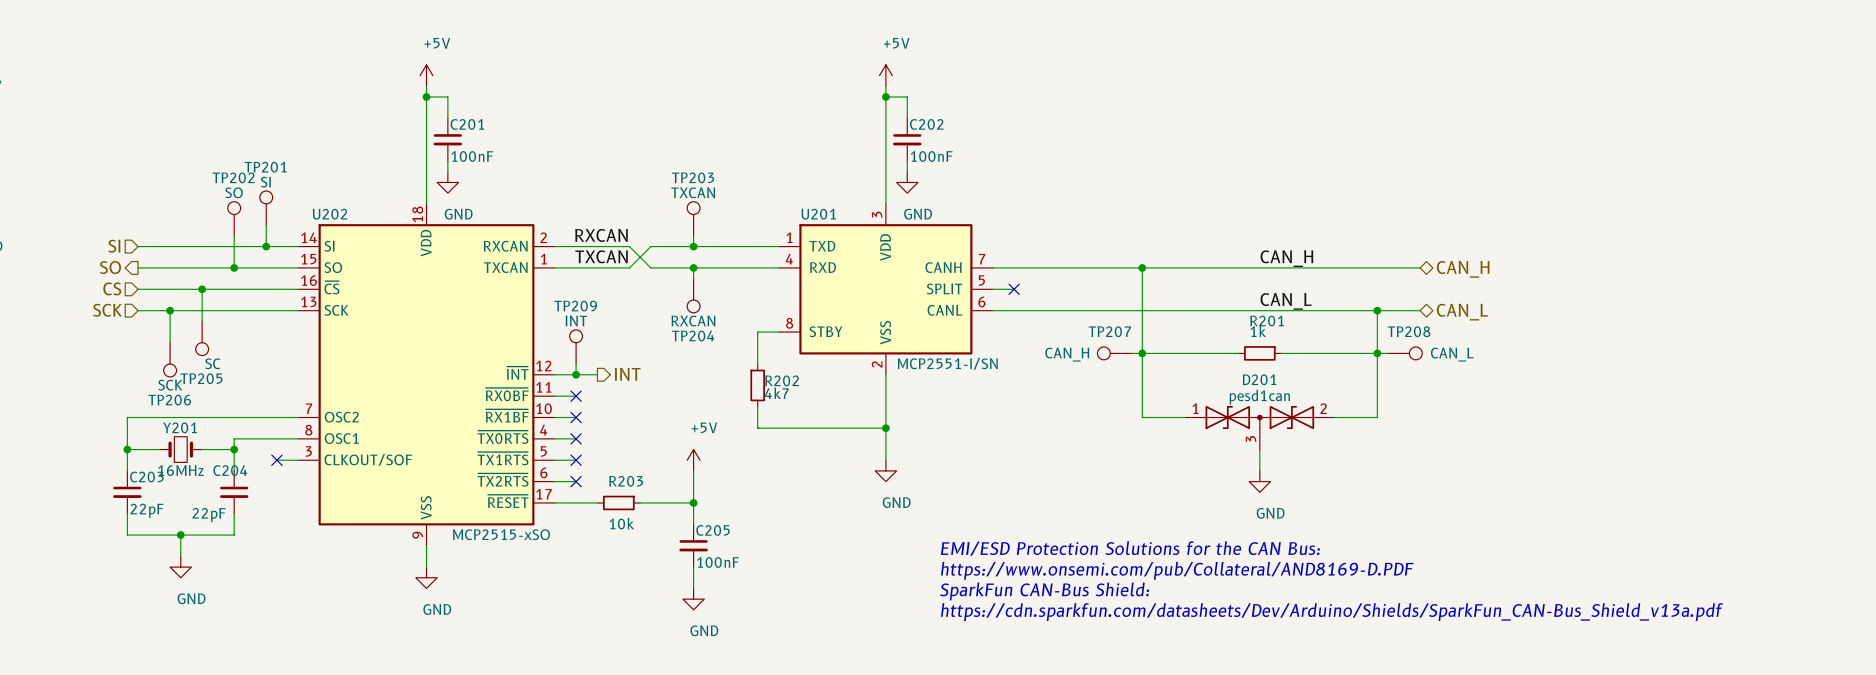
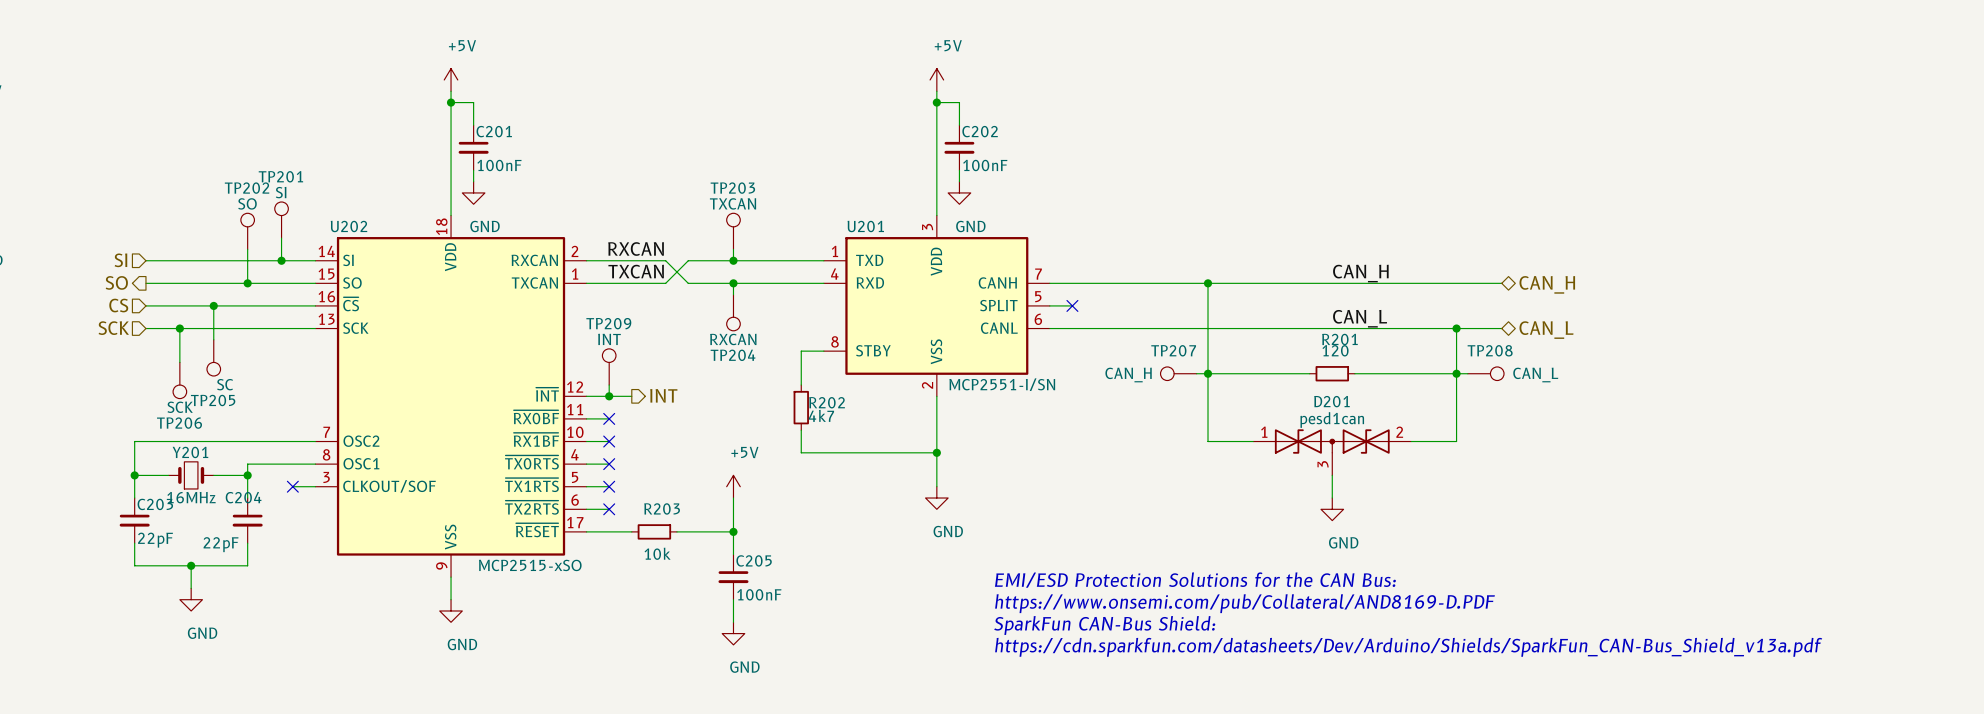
R201 value: 1k (1258, 331) -> 120 (1335, 350)

